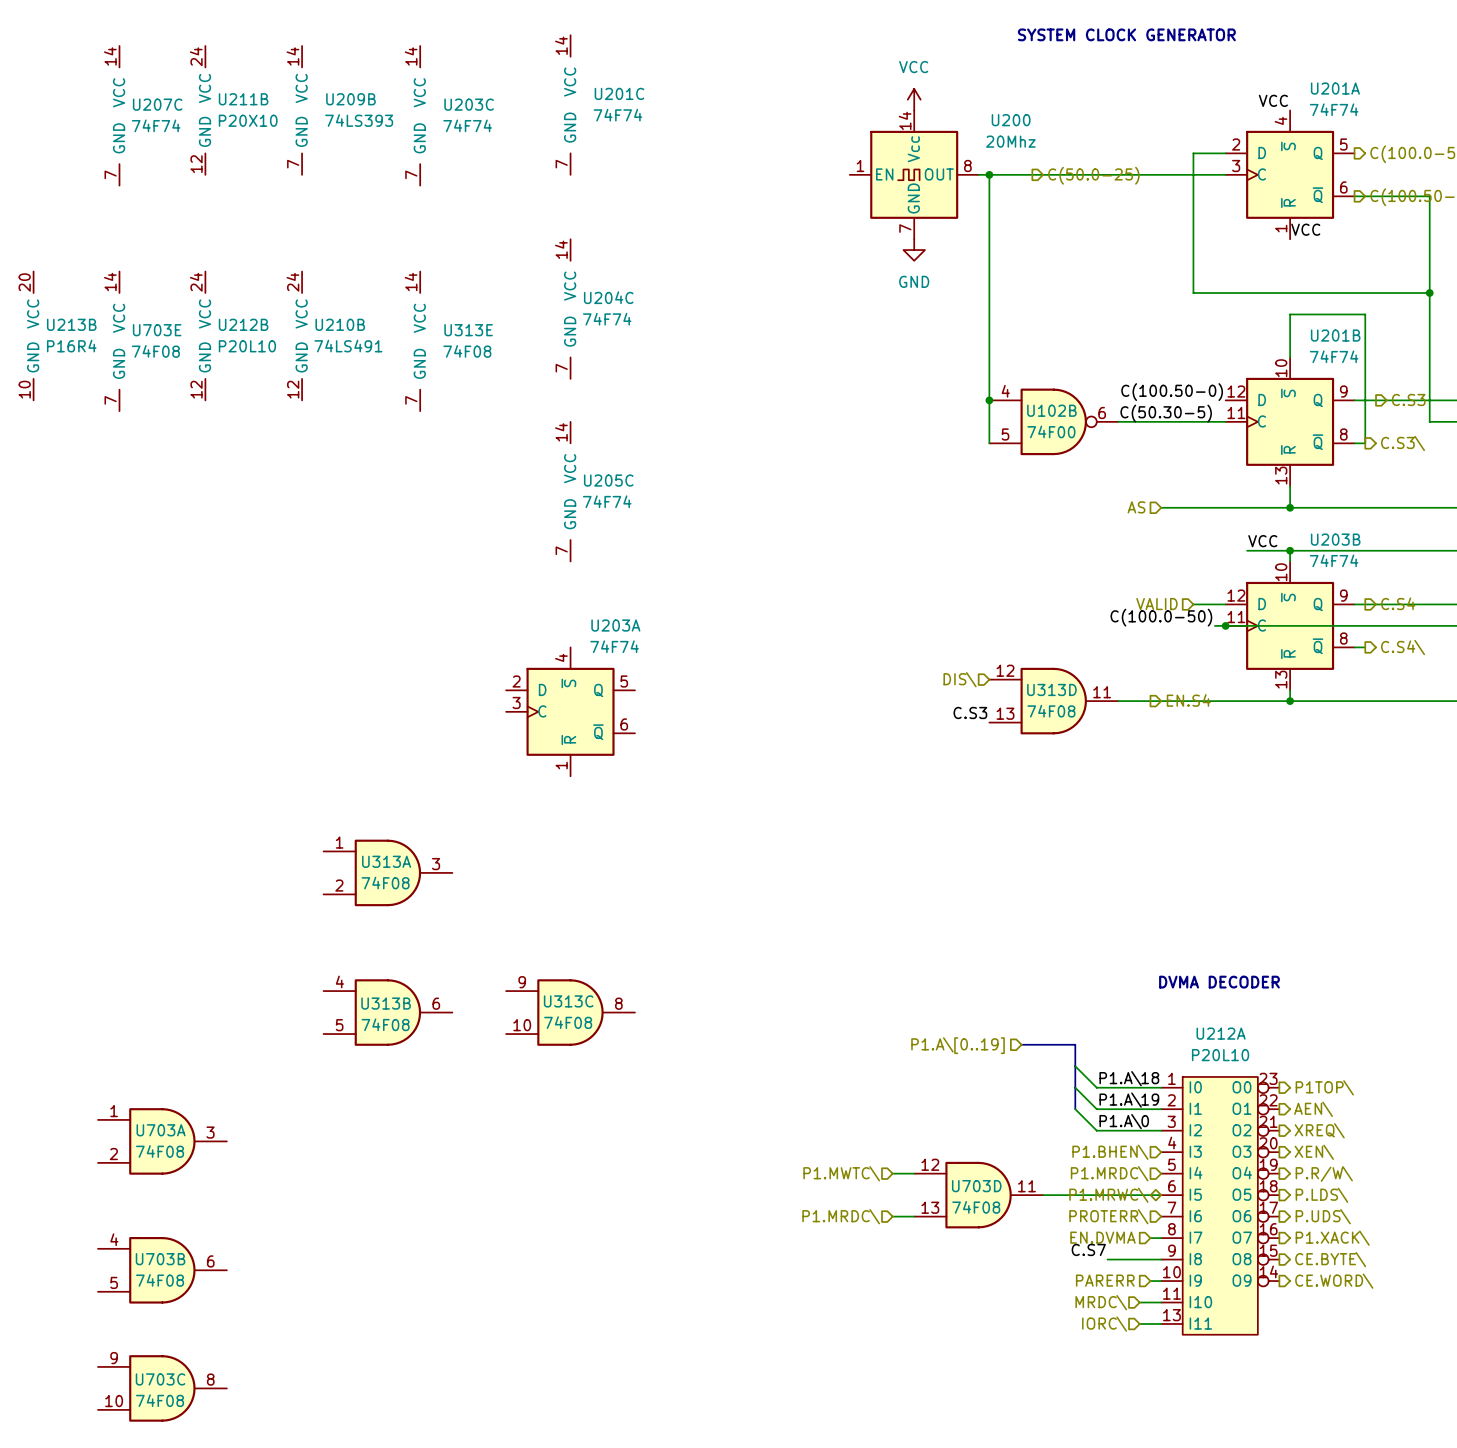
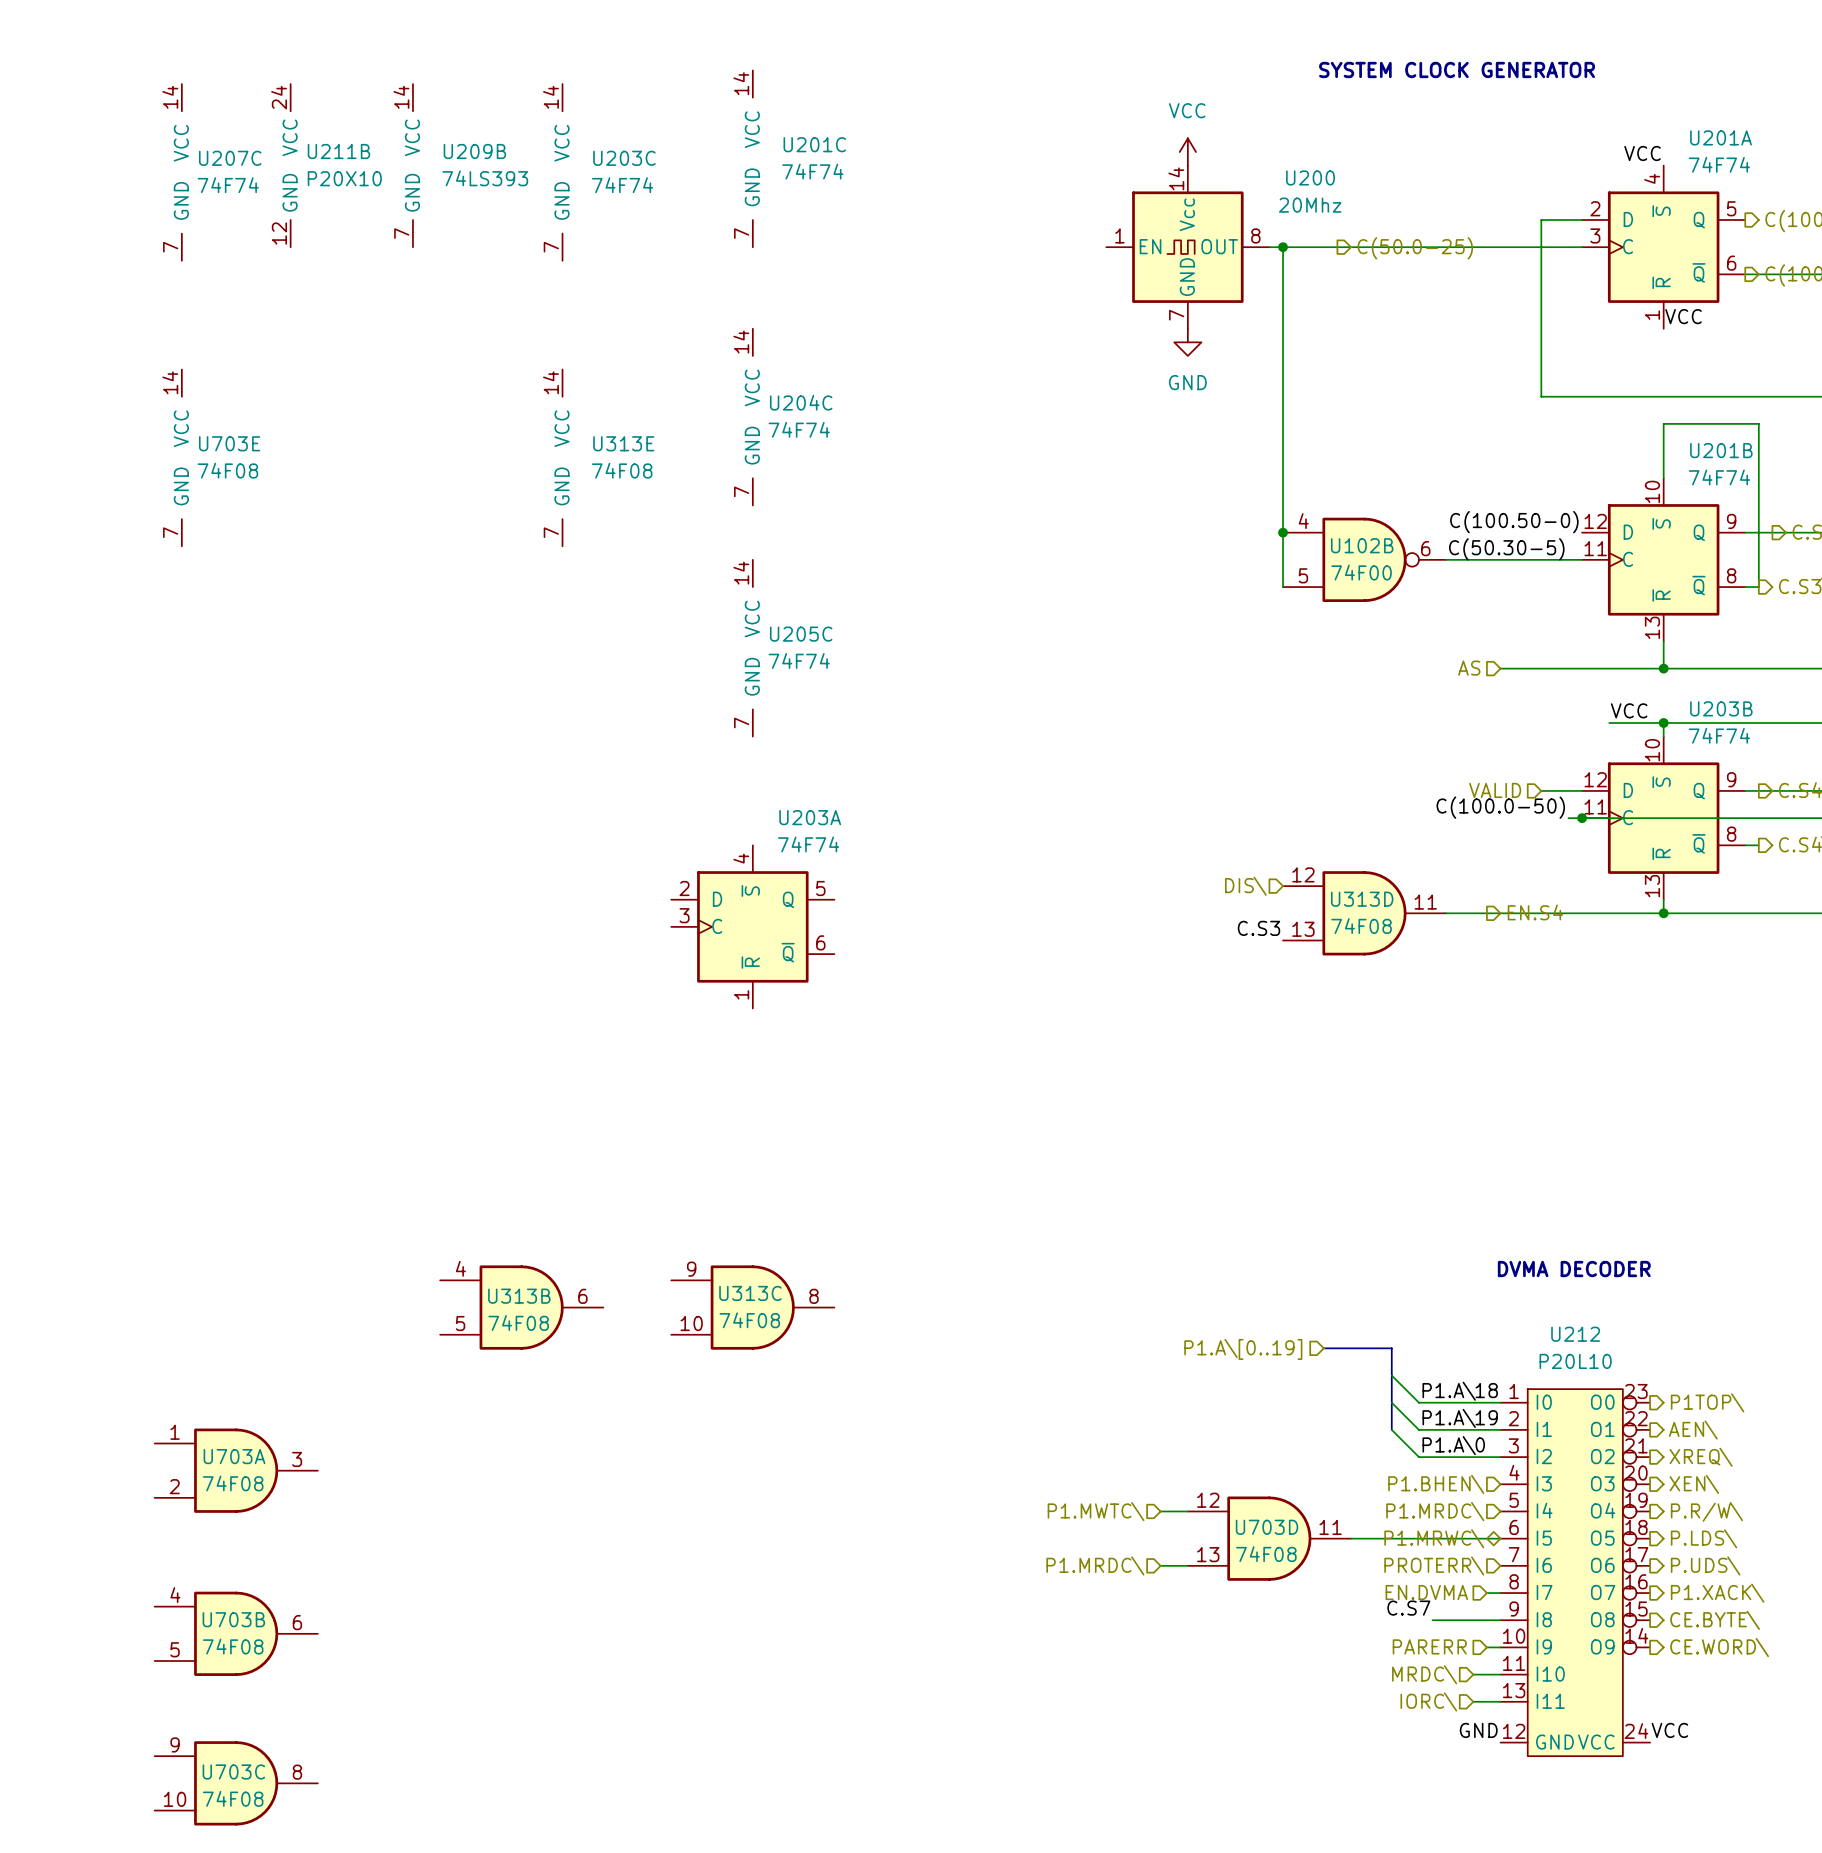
U213B: P16R4 (33, 335) -> none
U212B: P20L10 (205, 335) -> none
U210B: 74LS491 (302, 335) -> none
U313A: 74F08 (387, 872) -> none
U212A: P20L10 (1220, 1205) -> none
U212: none -> P20L10 (1575, 1572)
label: none -> GND (1478, 1730)
label: none -> VCC (1669, 1730)

